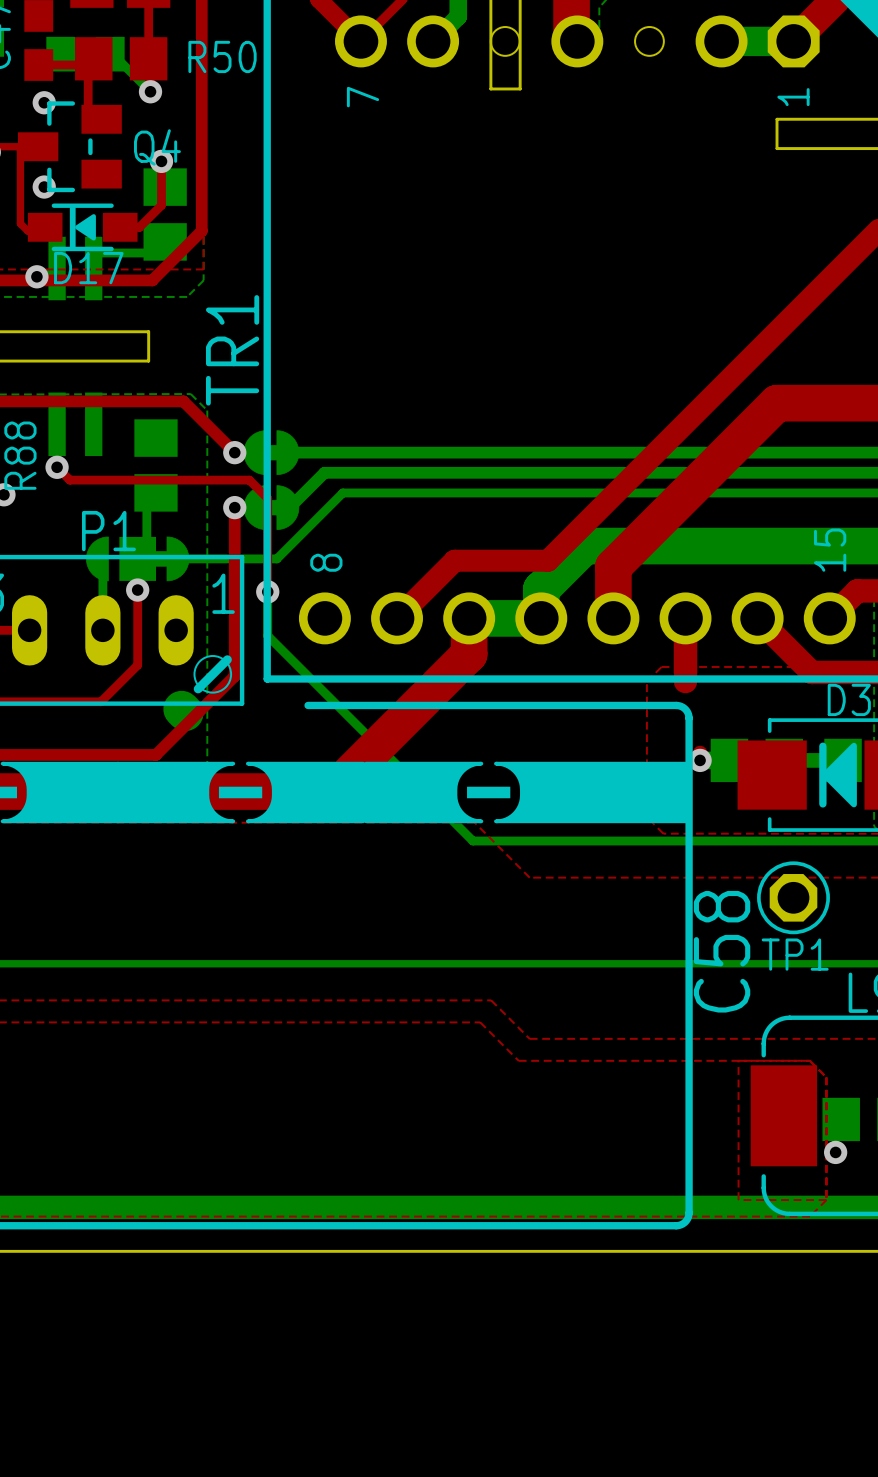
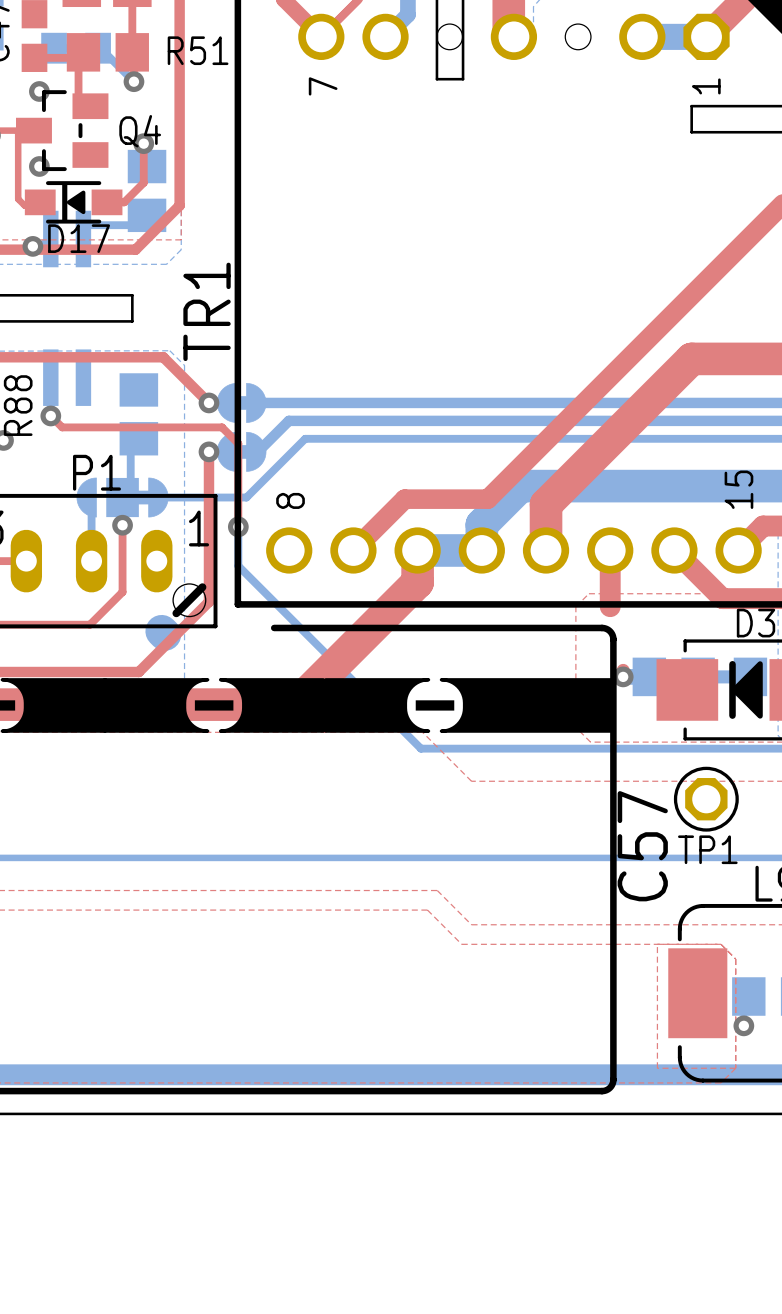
R50 name: R50 (222, 56) -> R51 (198, 50)
C58 name: C58 (722, 951) -> C57 (642, 846)

